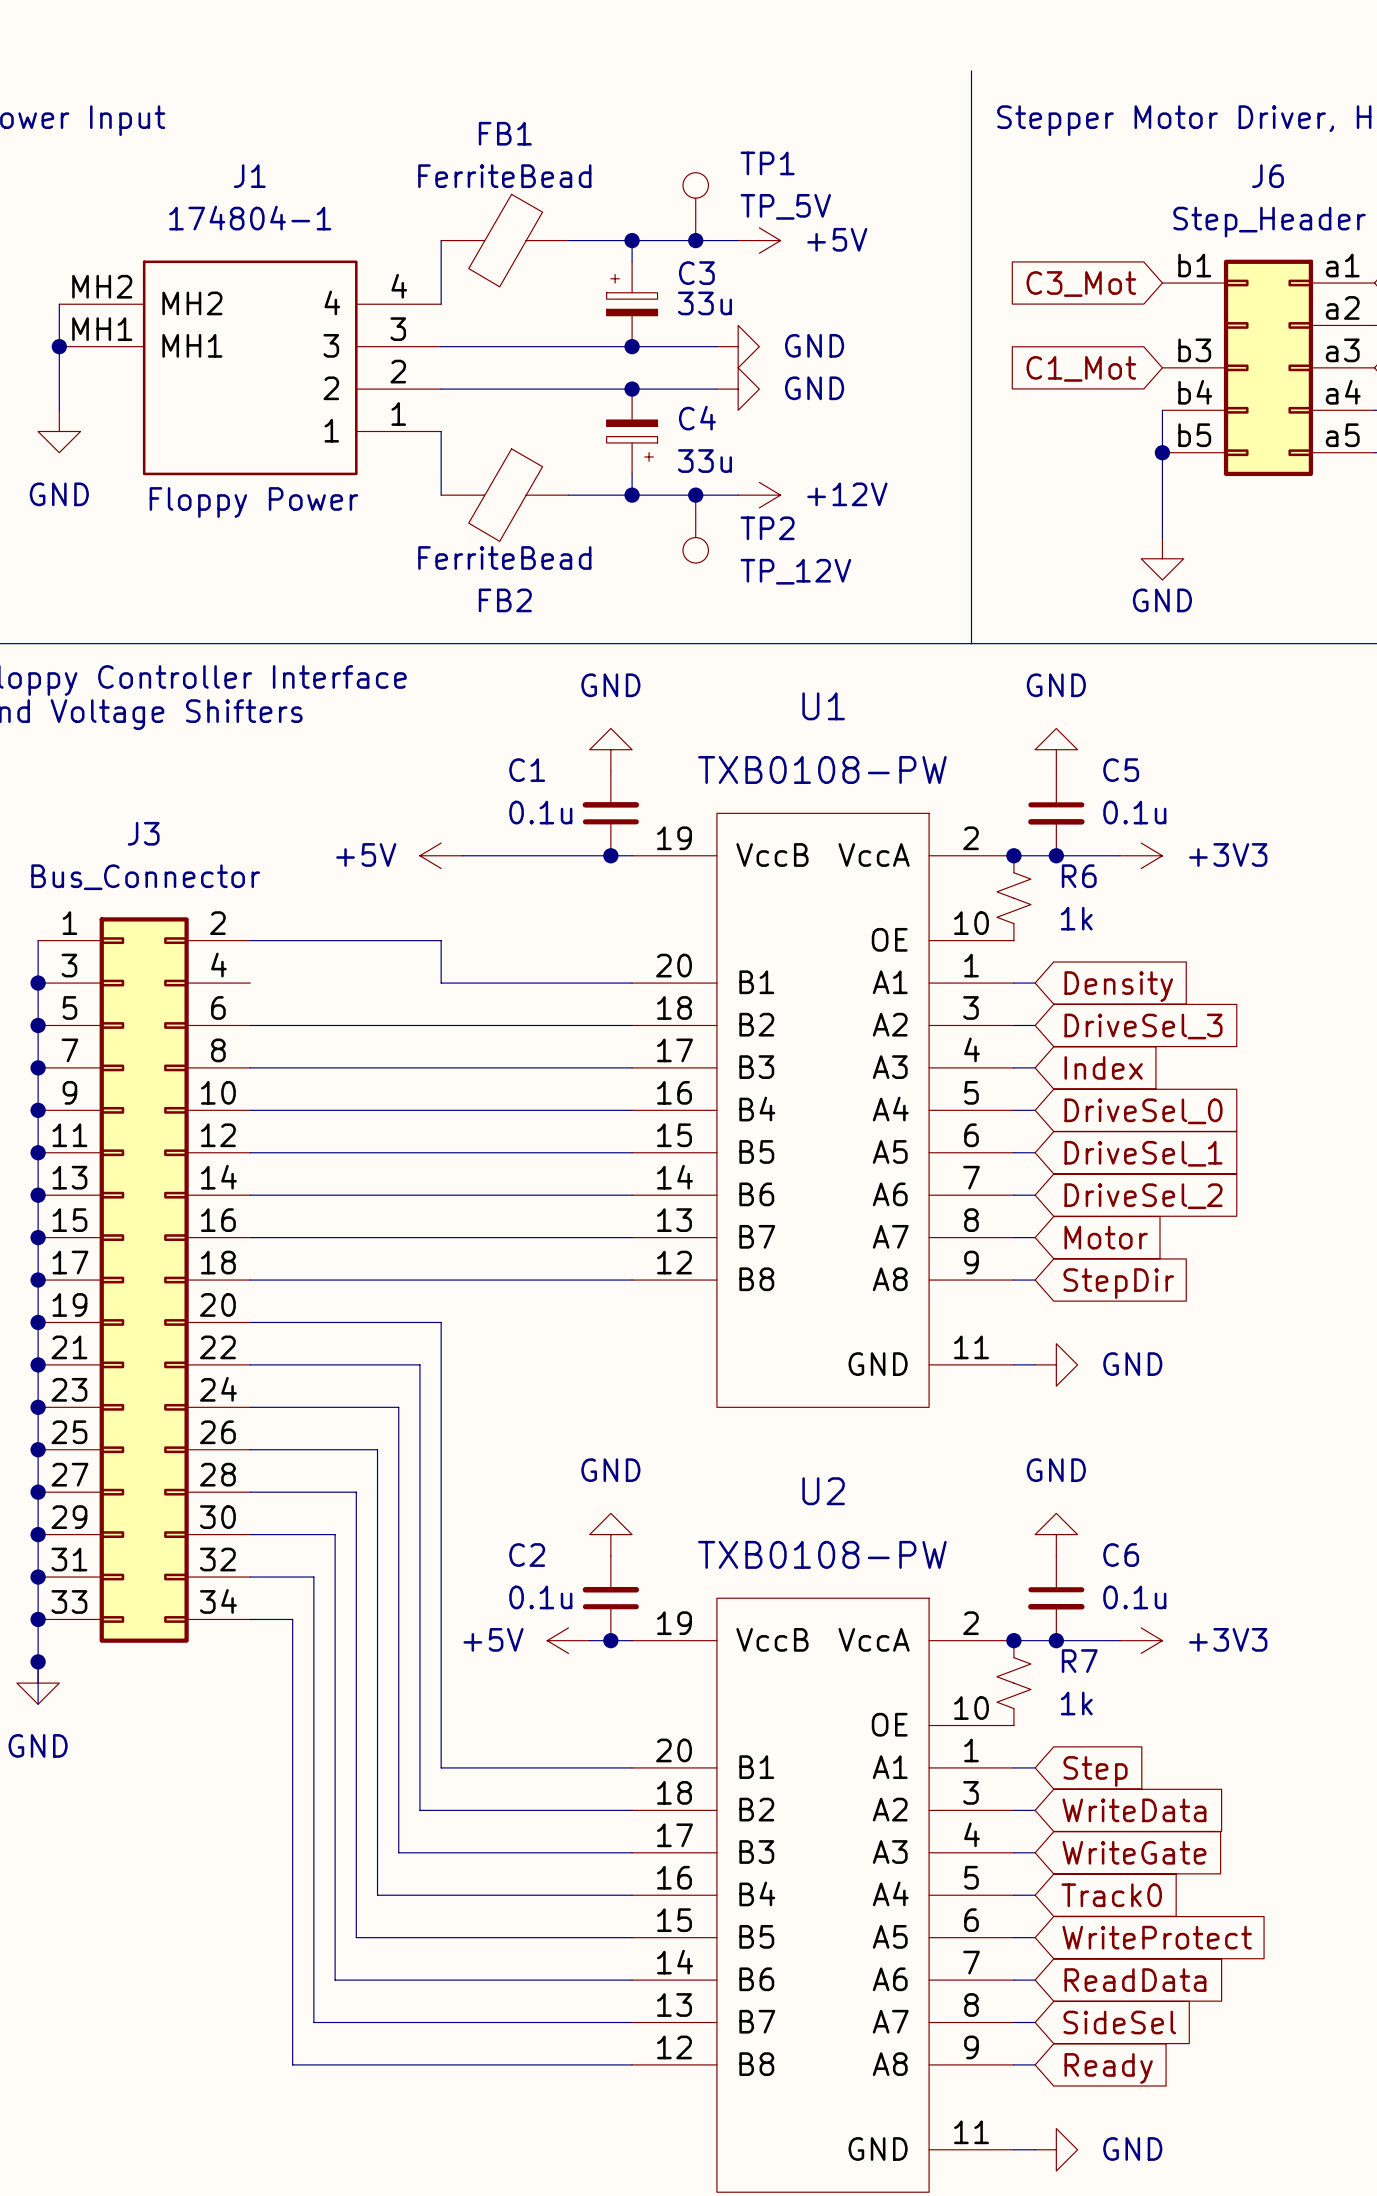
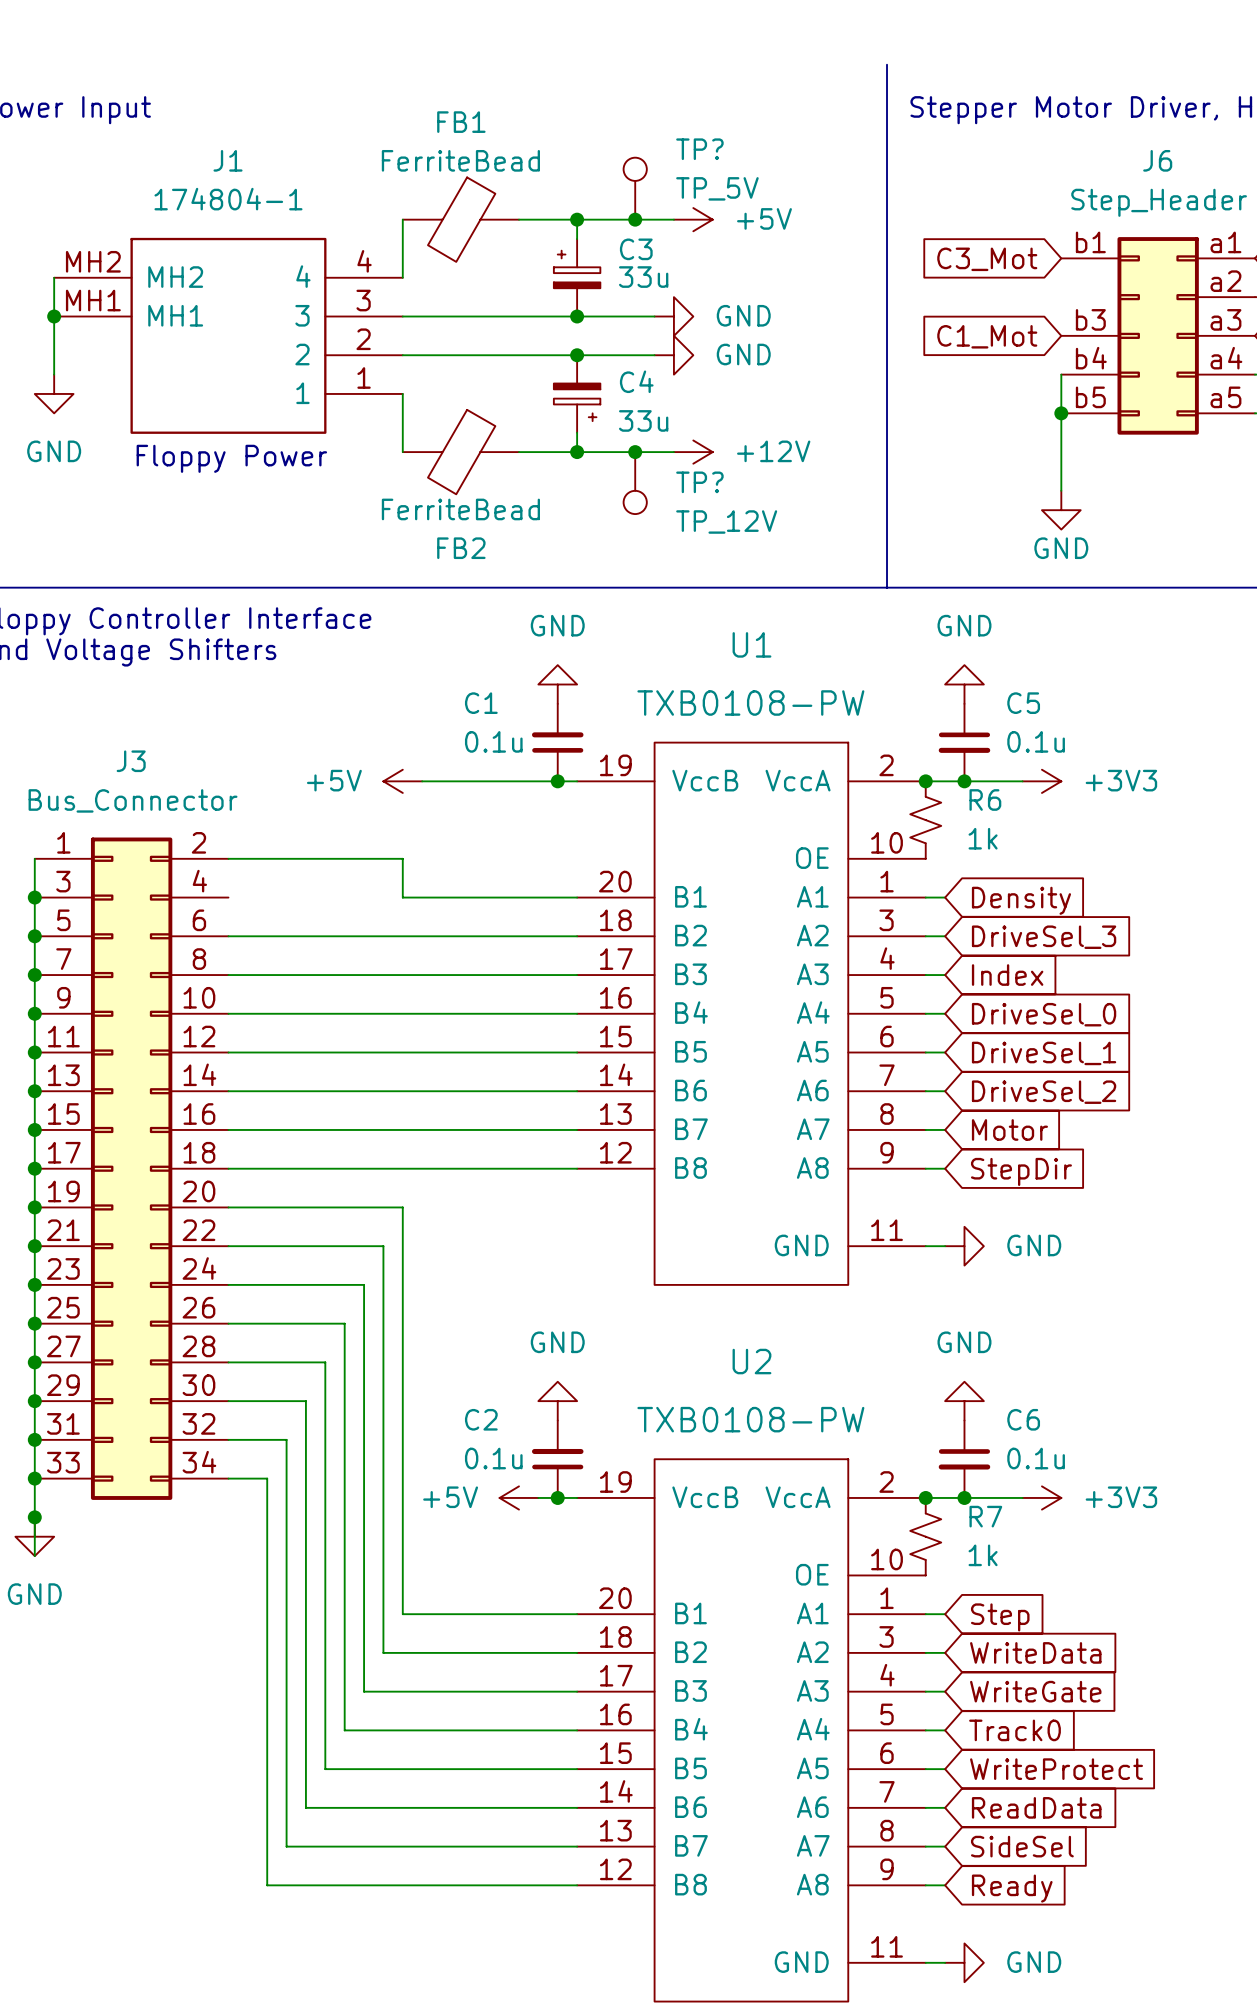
TP1 name: TP1 (767, 163) -> TP? (699, 149)
TP2 name: TP2 (767, 528) -> TP? (699, 482)

